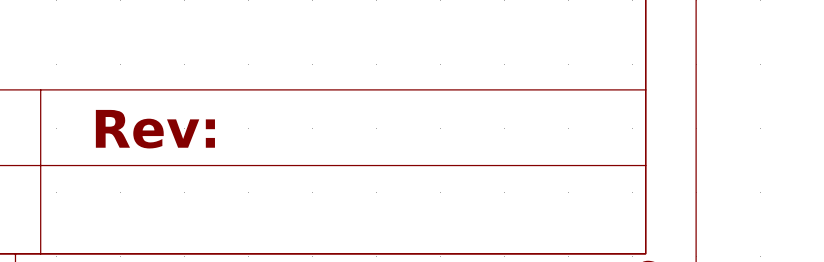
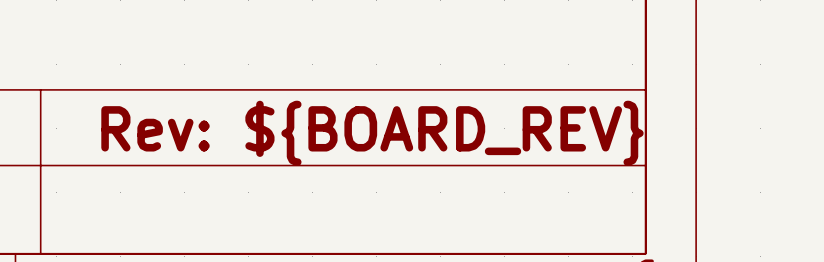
title block: Rev: (155, 129) -> Rev: ${BOARD_REV} (372, 133)

